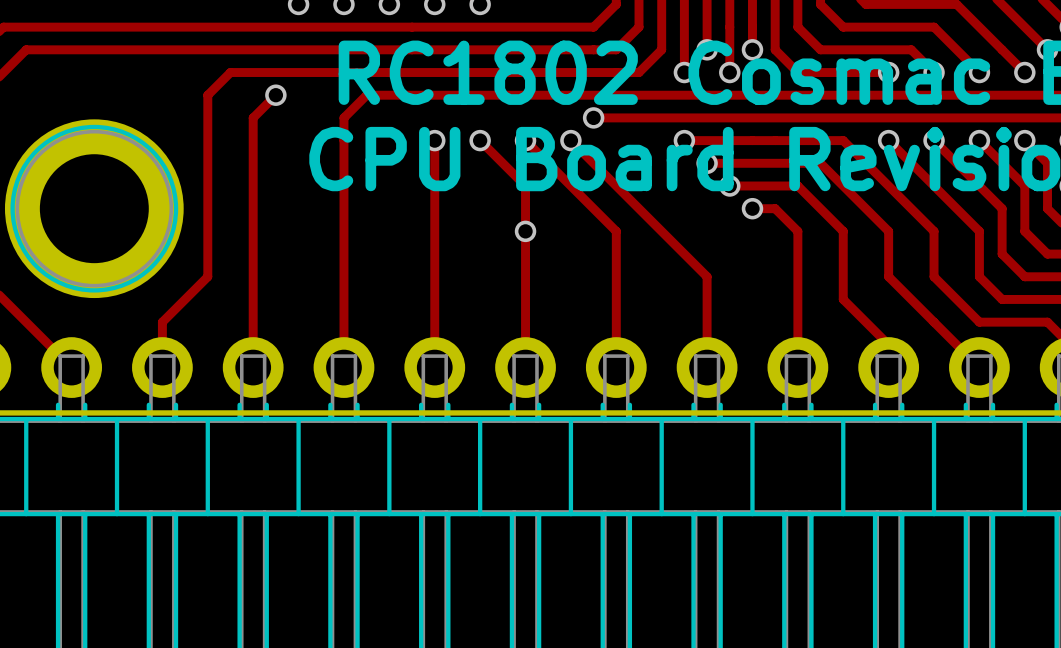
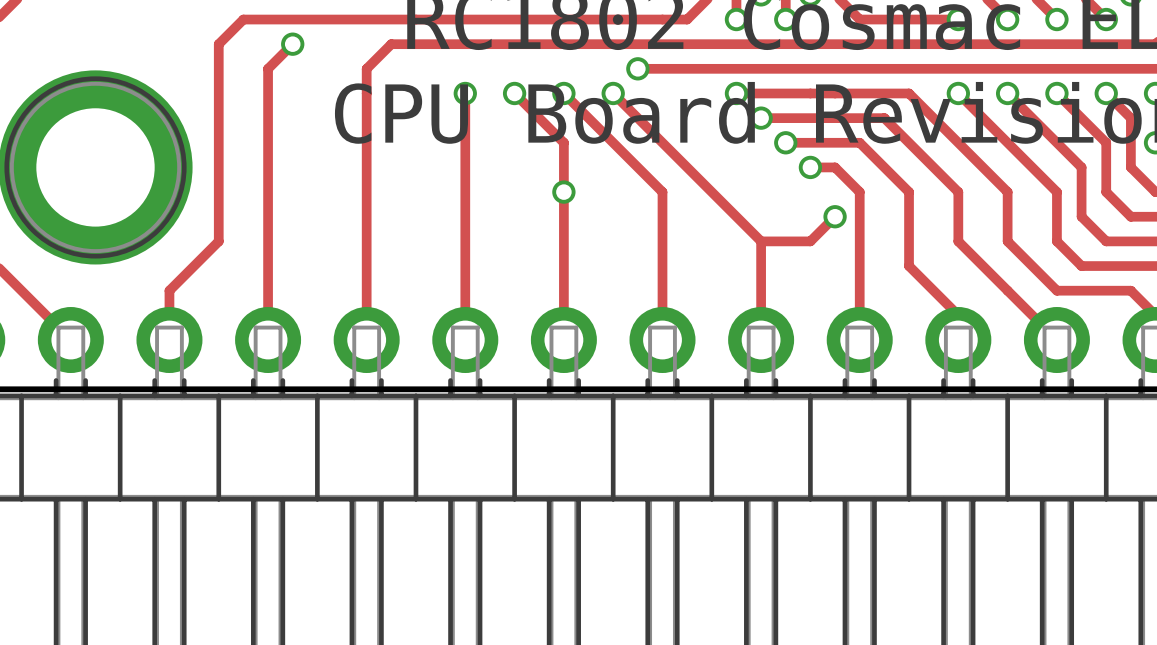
track: none -> (835, 216) (810, 241) (761, 241)
via: none -> (835, 216)

